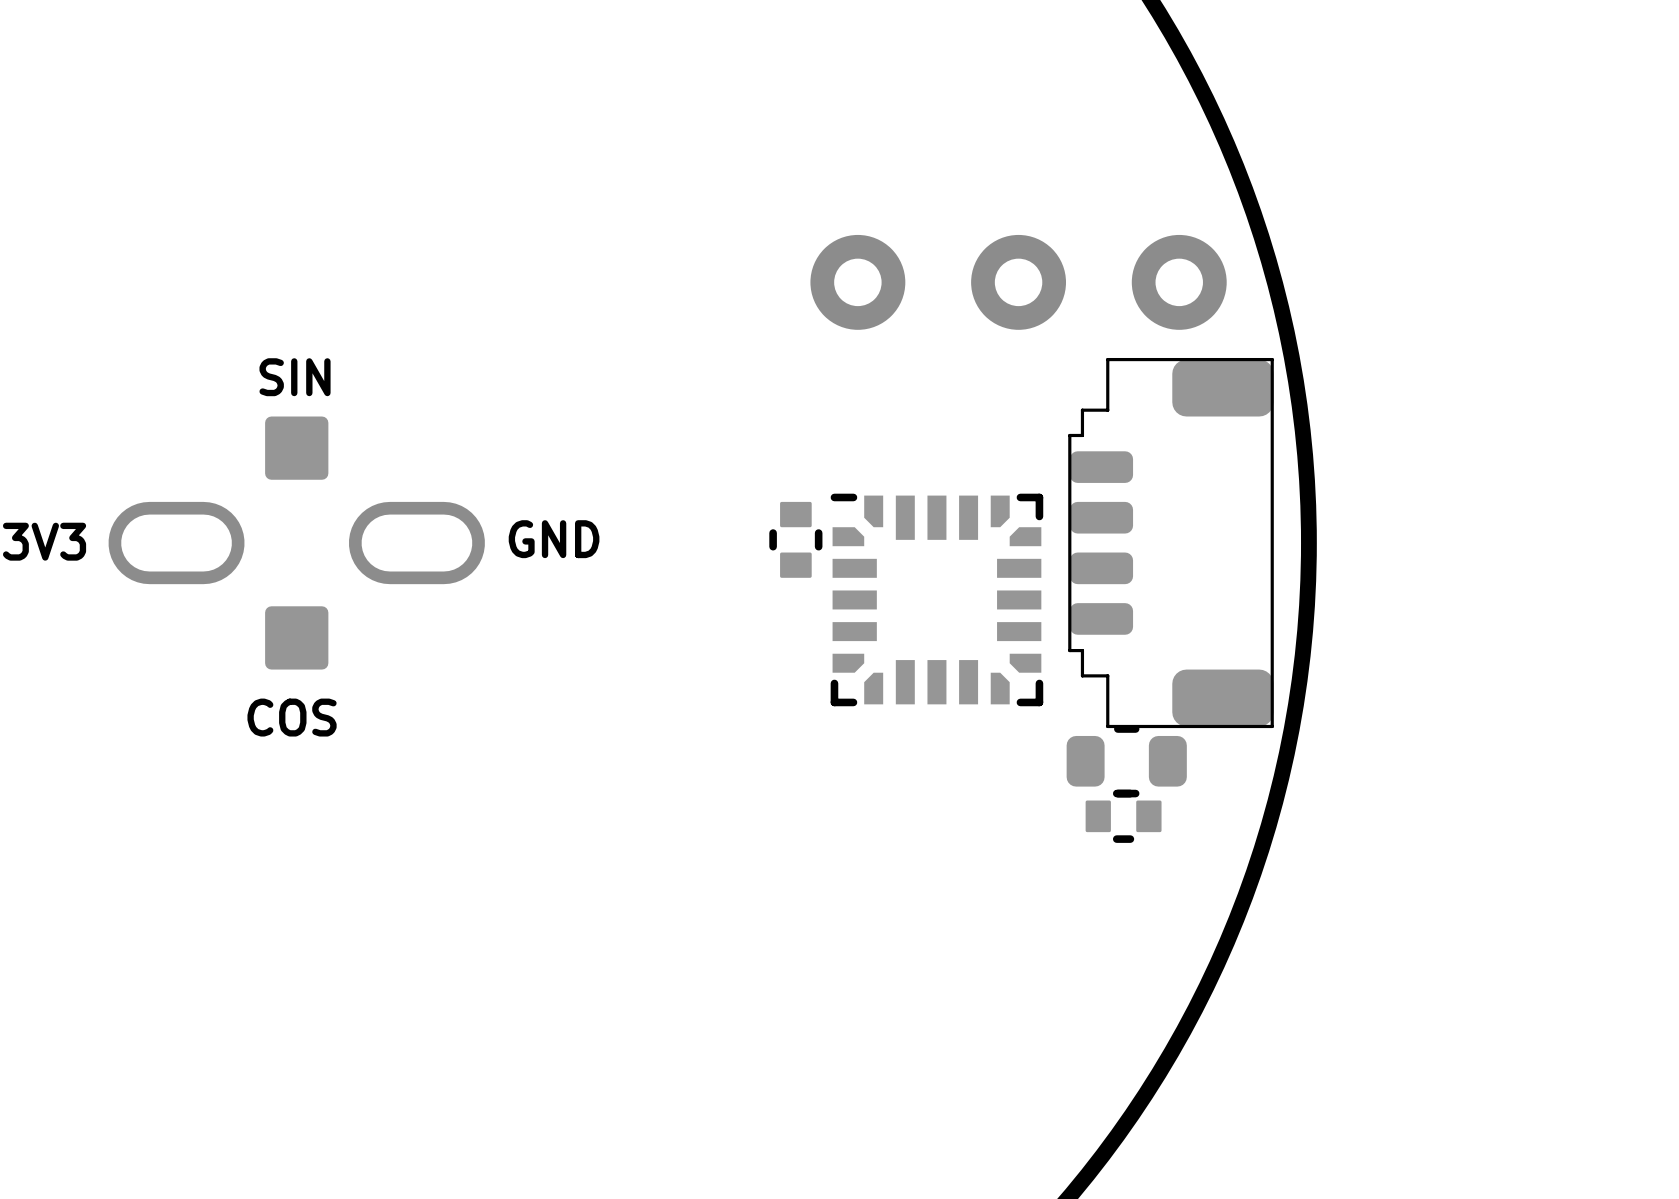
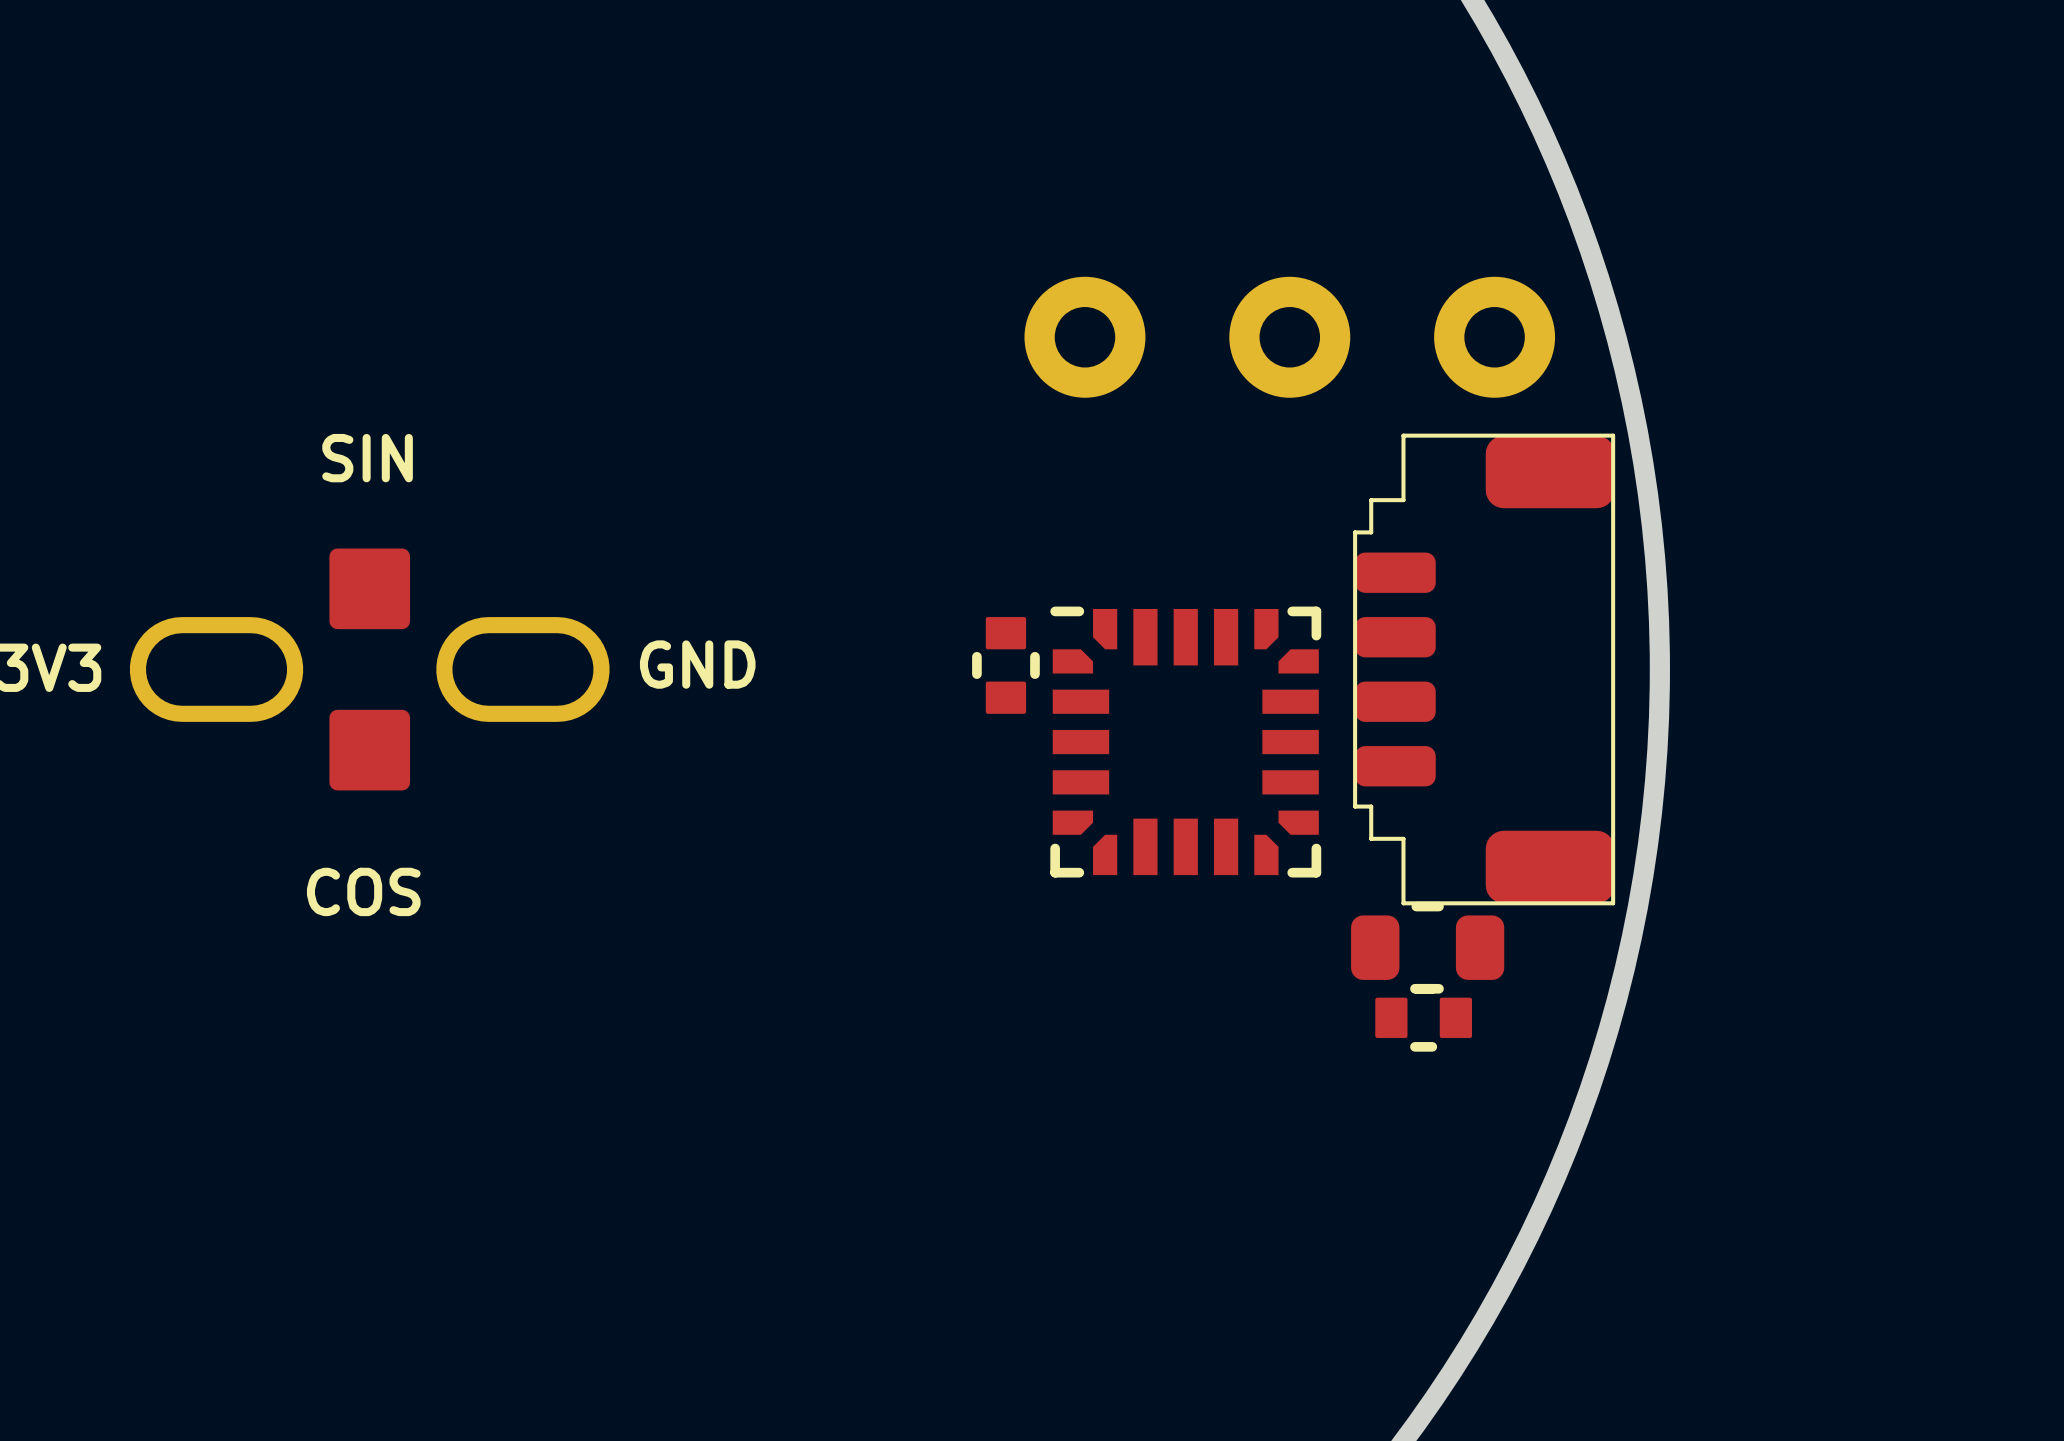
part position: (296, 448) -> (369, 588)
part position: (296, 637) -> (369, 750)

